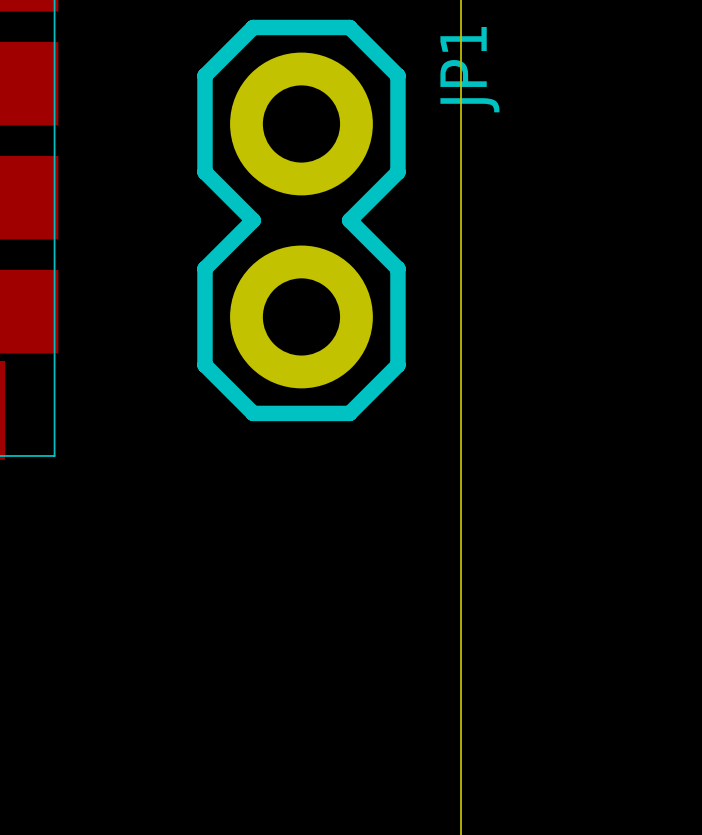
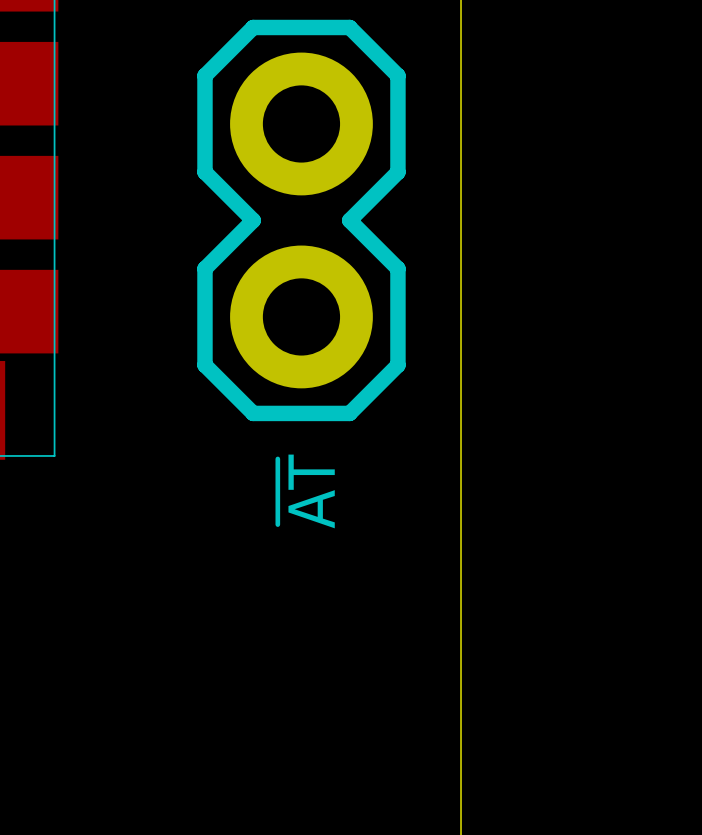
JP1 name: JP1 (469, 69) -> ~{AT} (306, 491)

